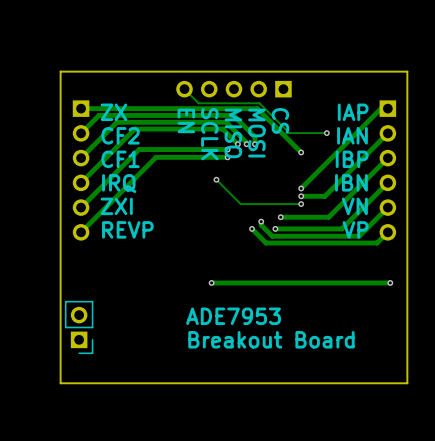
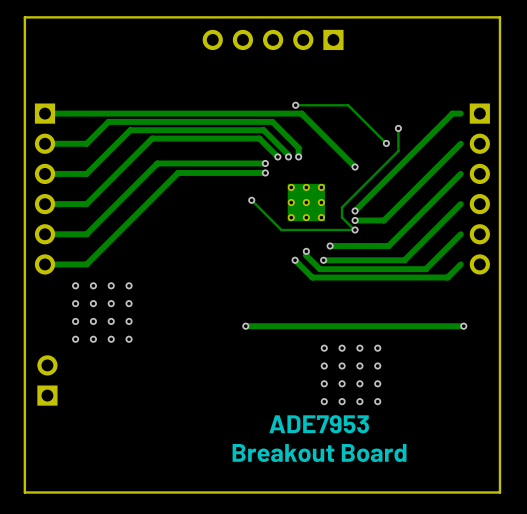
board edge: (407, 71) (60, 71) (60, 383) (407, 383) (407, 71) -> (499, 17) (499, 492) (24, 492) (24, 17) (499, 17)
track: (184, 89) (198, 103) (259, 103) (289, 133) (326, 133) -> (295, 105) (348, 105) (386, 143)
part position: (233, 89) -> (273, 39)
via: none -> (295, 105)
track: none -> (86, 113) (44, 113)
text: ZX (113, 112) -> none
text: IAP (353, 112) -> none
text: EN (186, 120) -> none
text: CS (280, 120) -> none
track: none -> (398, 128) (398, 151) (342, 207) (342, 217) (354, 229)
via: none -> (398, 128)
track: none -> (86, 143) (44, 143)
text: MISO (233, 133) -> none
text: MOSI (256, 133) -> none
text: SCLK (209, 134) -> none
text: CF2 (120, 135) -> none
text: IAN (352, 135) -> none
track: none -> (86, 173) (44, 173)
text: CF1 (120, 159) -> none
text: IBP (352, 159) -> none
part position: (81, 170) -> (44, 189)
part position: (387, 170) -> (479, 189)
part: none -> (306, 202)
track: none -> (86, 204) (44, 204)
text: IBN (351, 182) -> none
text: IRQ (119, 183) -> none
text: ZXI (116, 206) -> none
text: VN (354, 206) -> none
track: none -> (86, 234) (44, 234)
text: REVP (127, 229) -> none
text: VP (355, 229) -> none
track: none -> (86, 264) (44, 264)
via: none -> (75, 285)
via: none -> (93, 285)
via: none -> (111, 285)
via: none -> (129, 285)
via: none -> (75, 303)
via: none -> (93, 303)
via: none -> (111, 303)
via: none -> (129, 303)
via: none -> (75, 321)
via: none -> (93, 321)
via: none -> (111, 321)
via: none -> (129, 321)
via: none -> (75, 339)
via: none -> (93, 339)
via: none -> (111, 339)
via: none -> (129, 339)
via: none -> (324, 348)
via: none -> (342, 348)
via: none -> (359, 348)
via: none -> (377, 348)
via: none -> (324, 365)
via: none -> (342, 365)
via: none -> (359, 365)
via: none -> (377, 365)
text position: ADE7953 (233, 316) -> ADE7953 (319, 424)
part side: bottom (79, 327) -> top (47, 380)
via: none -> (324, 383)
via: none -> (342, 383)
via: none -> (359, 383)
via: none -> (377, 383)
text position: Breakout Board (271, 339) -> Breakout Board (319, 453)
via: none -> (324, 401)
via: none -> (342, 401)
via: none -> (359, 401)
via: none -> (377, 401)

